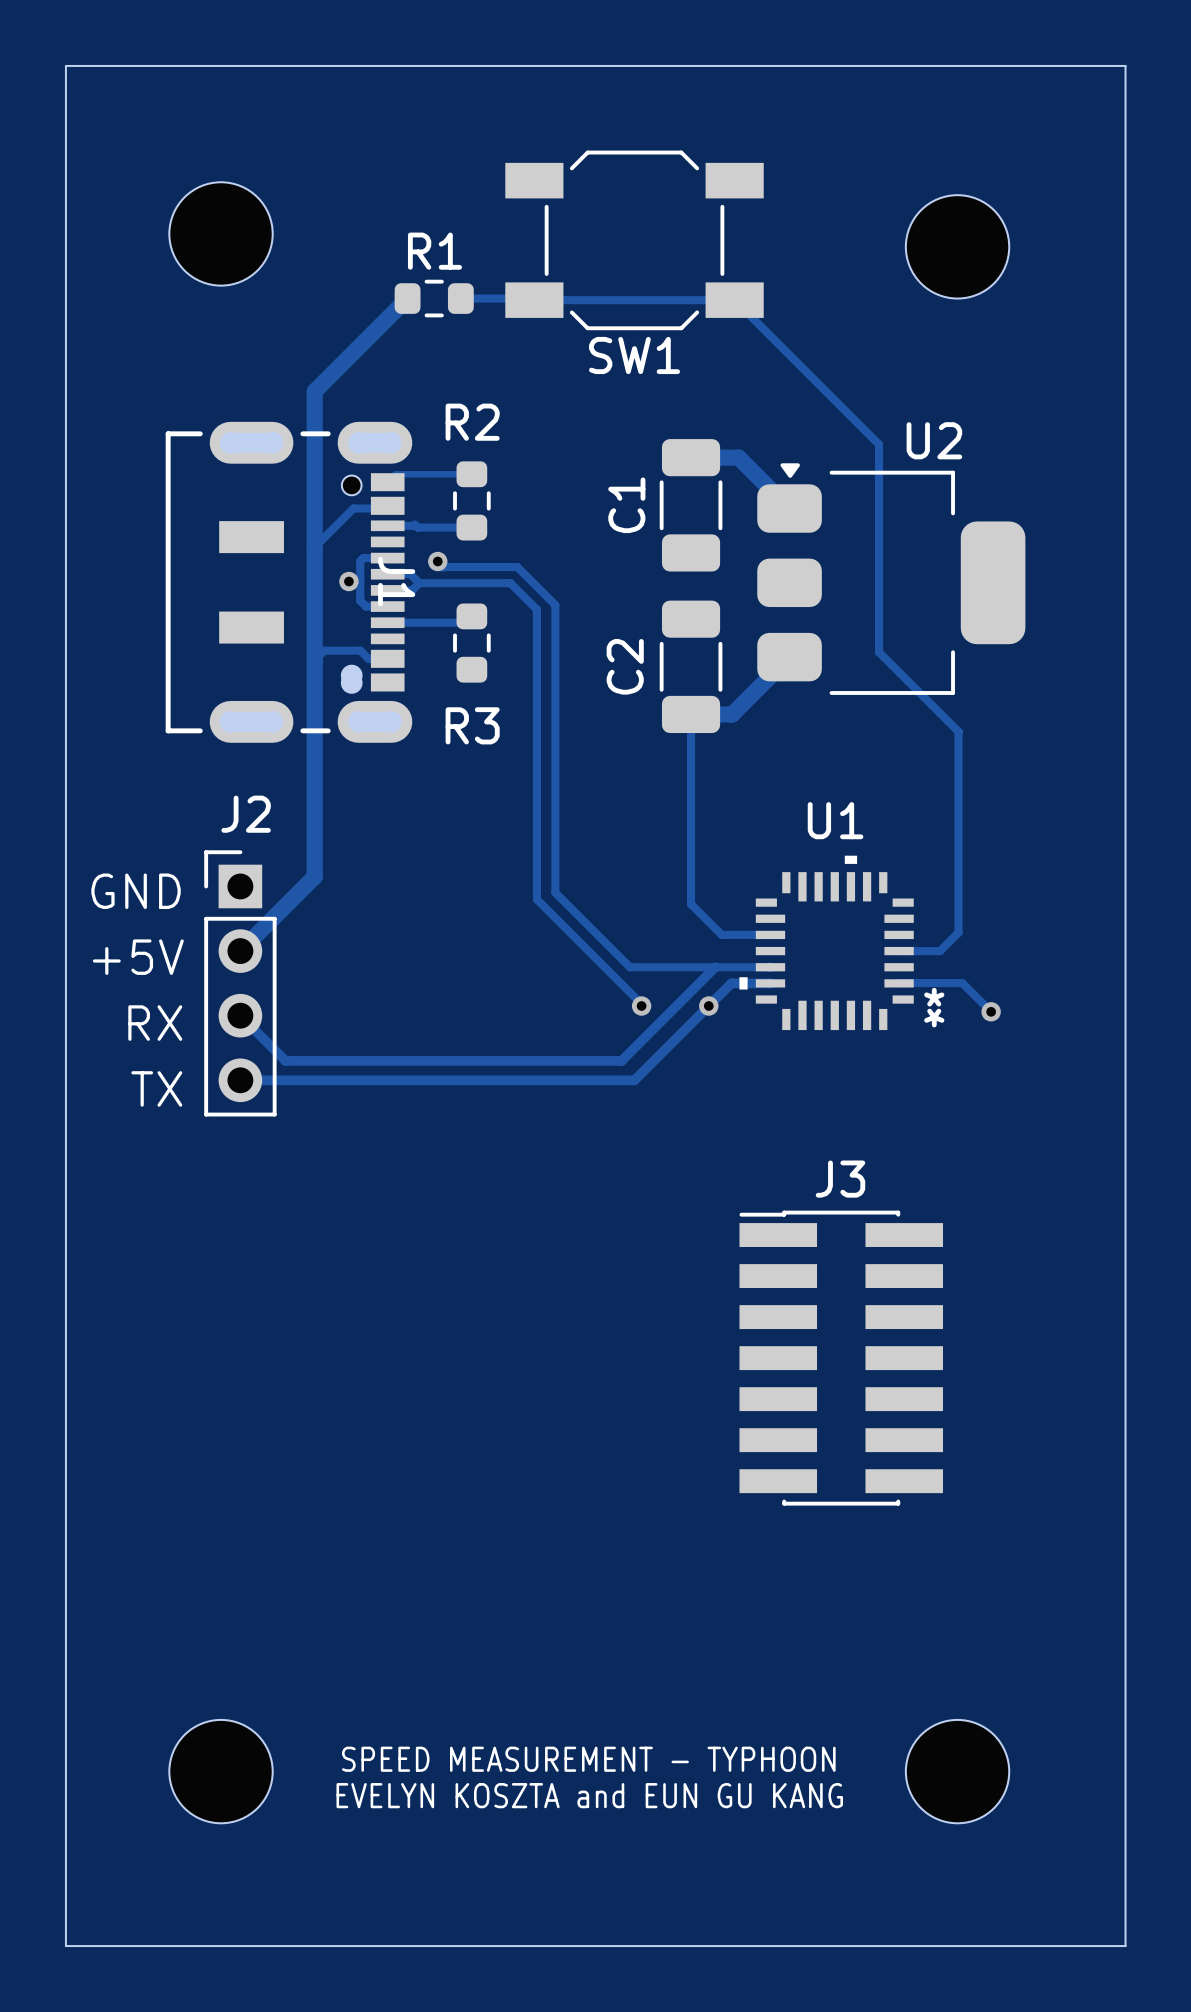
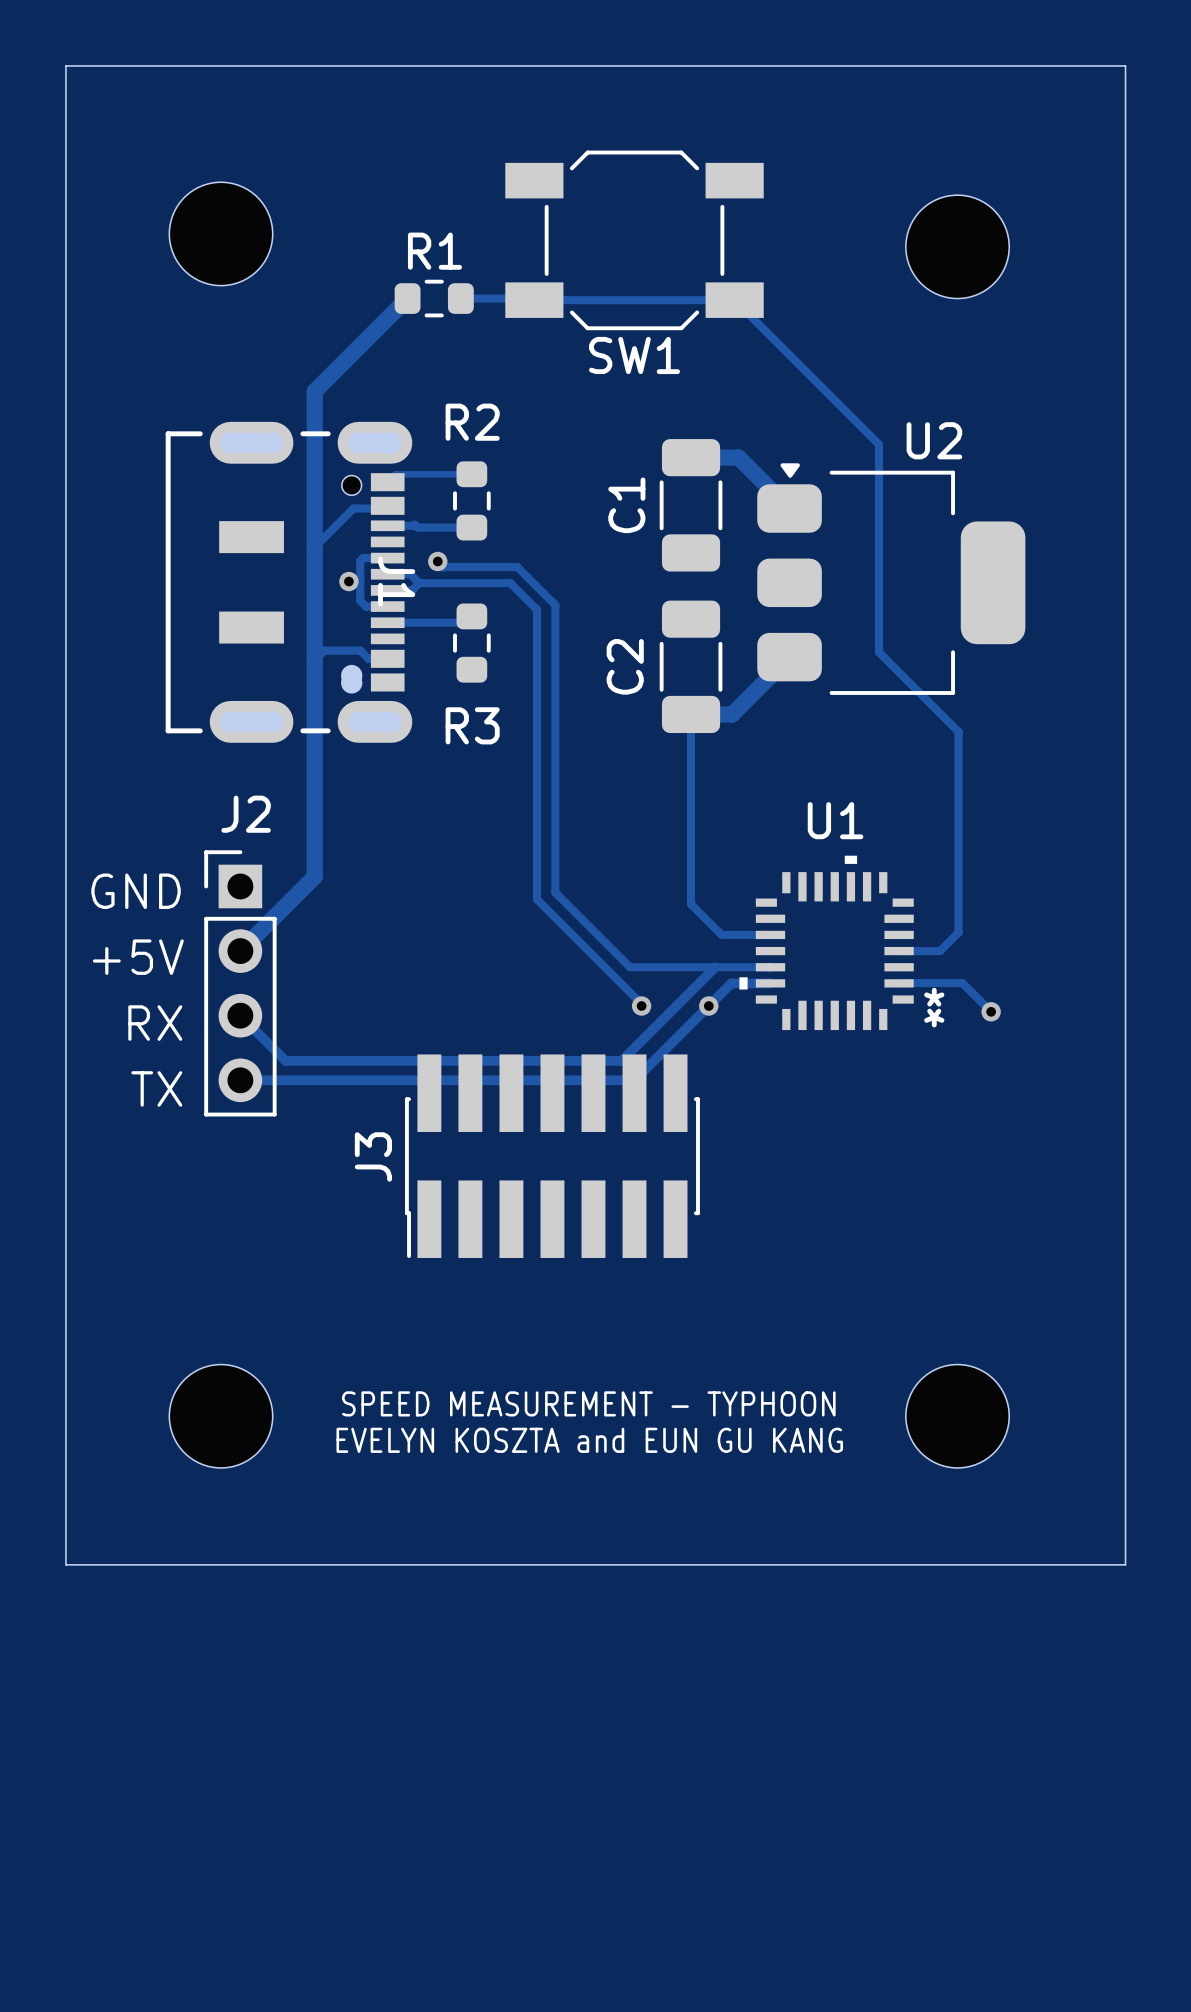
J3 rotation: 0° (841, 1358) -> 90° counterclockwise (552, 1156)
J3 position: (841, 1358) -> (552, 1156)
board edge: (65, 1564) (65, 1946) (1125, 1946) (1125, 1564) -> (65, 1564) (1125, 1564)
text position: SPEED MEASUREMENT - TYPHOON (588, 1759) -> SPEED MEASUREMENT - TYPHOON (588, 1403)
part position: (221, 1771) -> (221, 1416)
part position: (957, 1771) -> (957, 1416)
text position: EVELYN KOSZTA and EUN GU KANG (589, 1795) -> EVELYN KOSZTA and EUN GU KANG (589, 1440)

